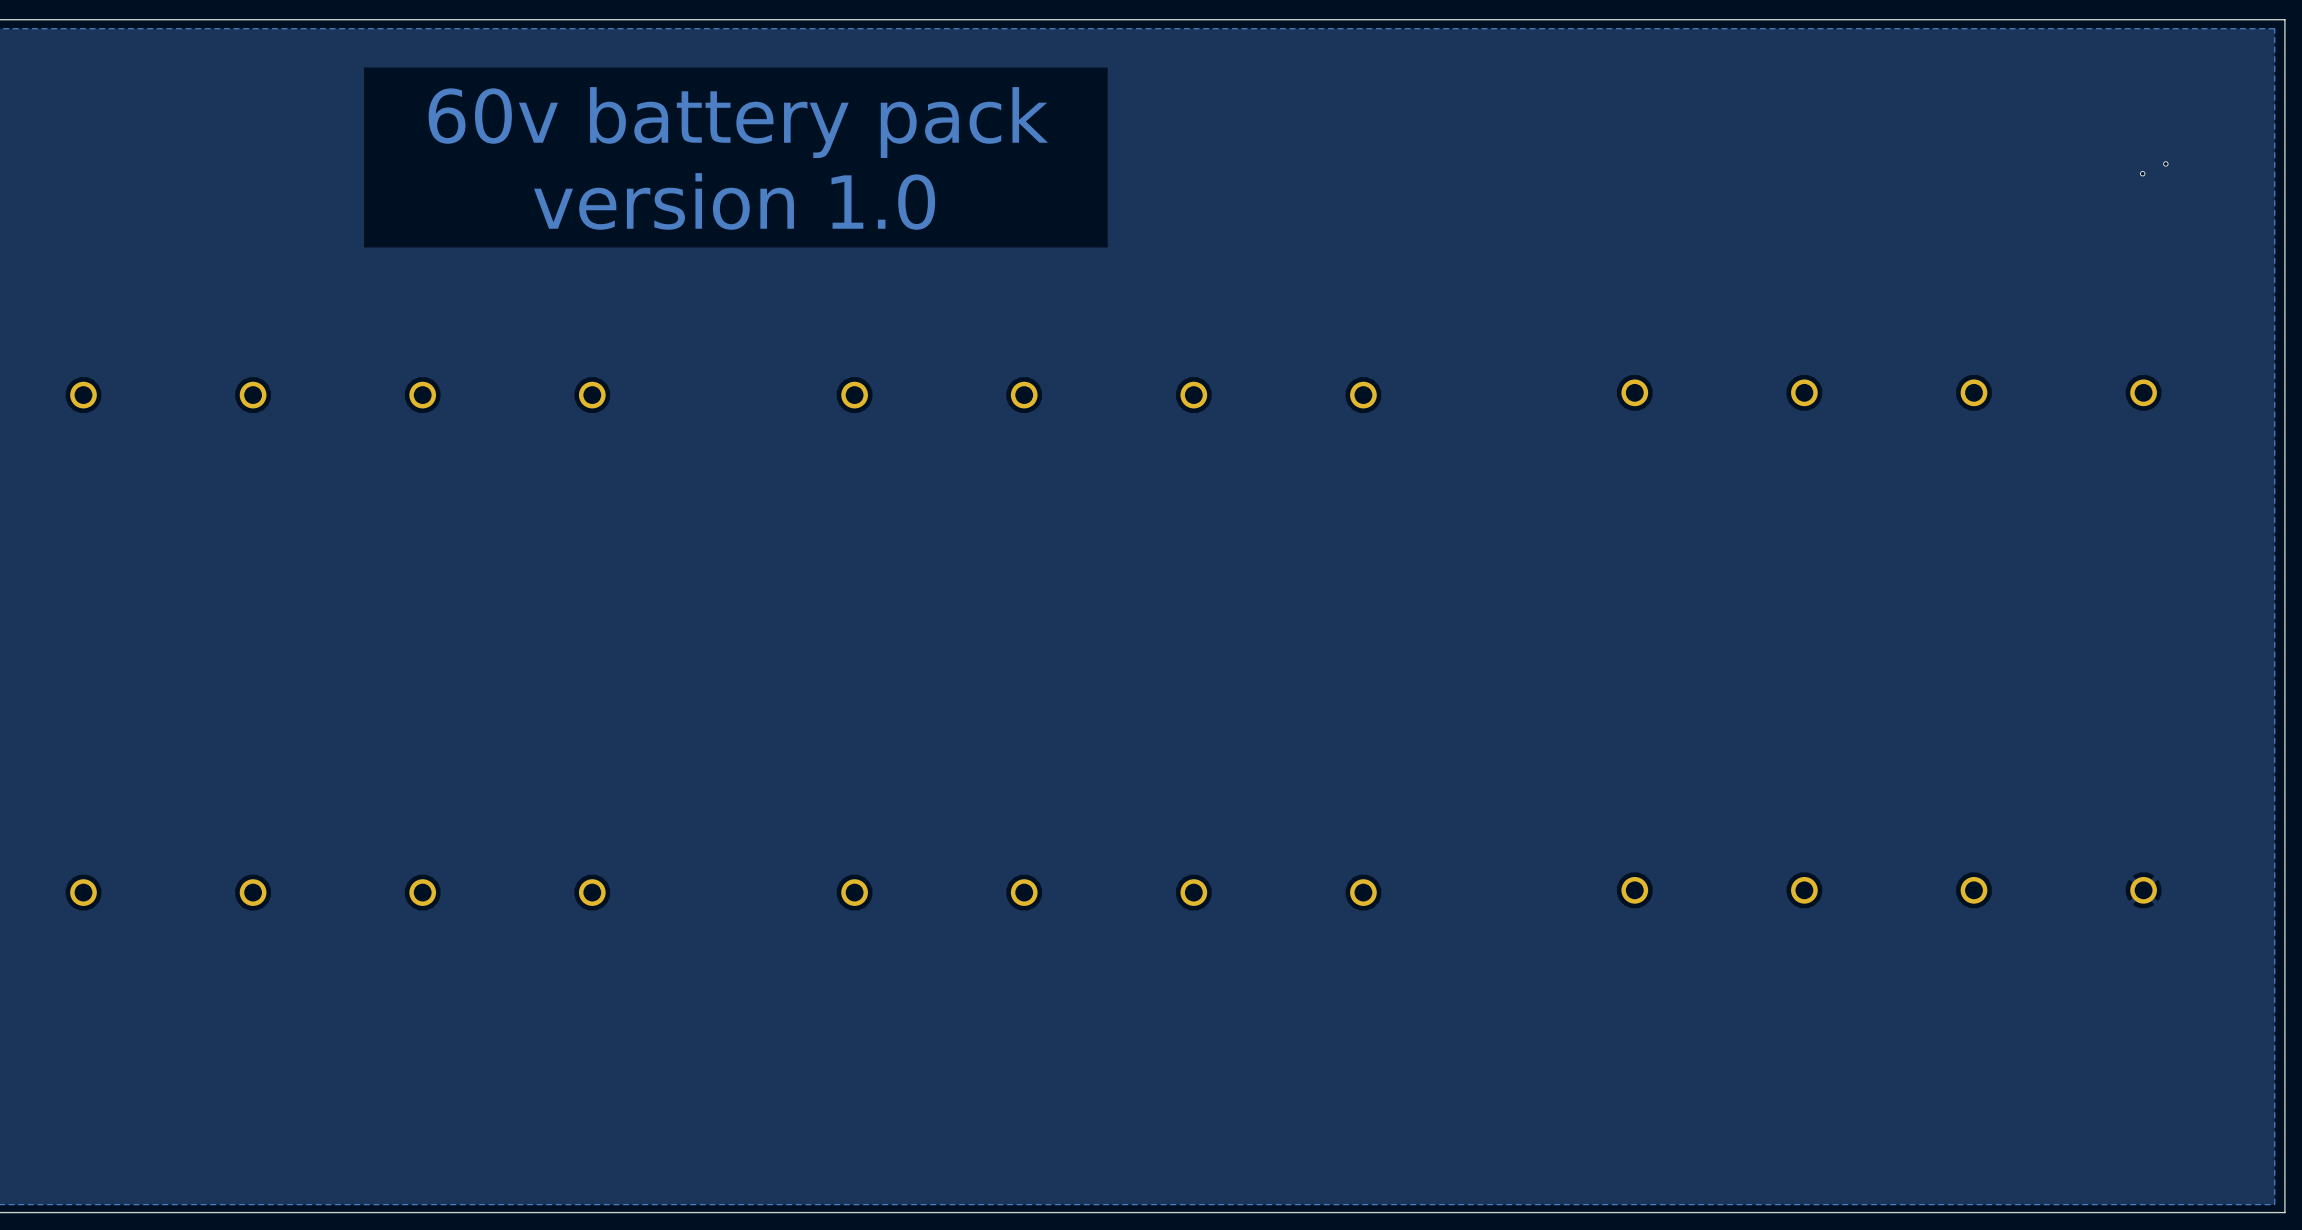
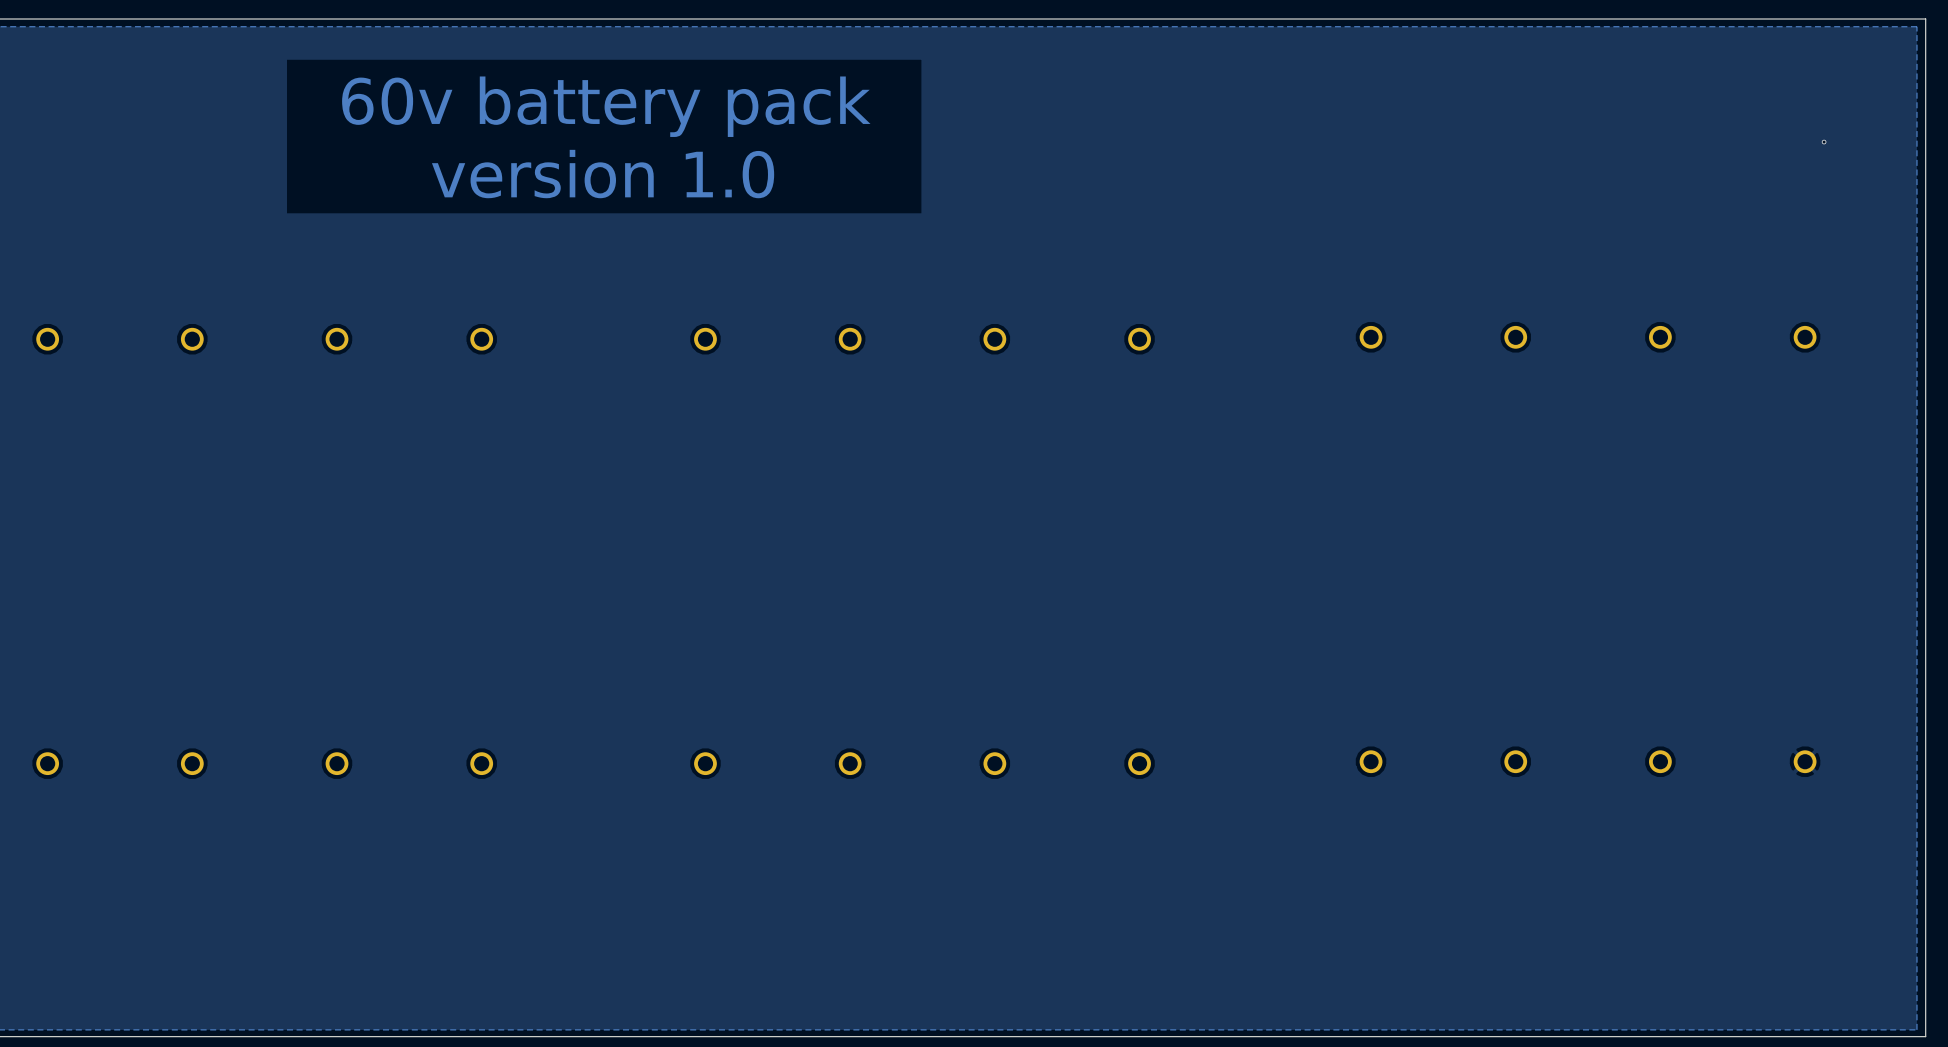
via: (2142, 173) -> none

